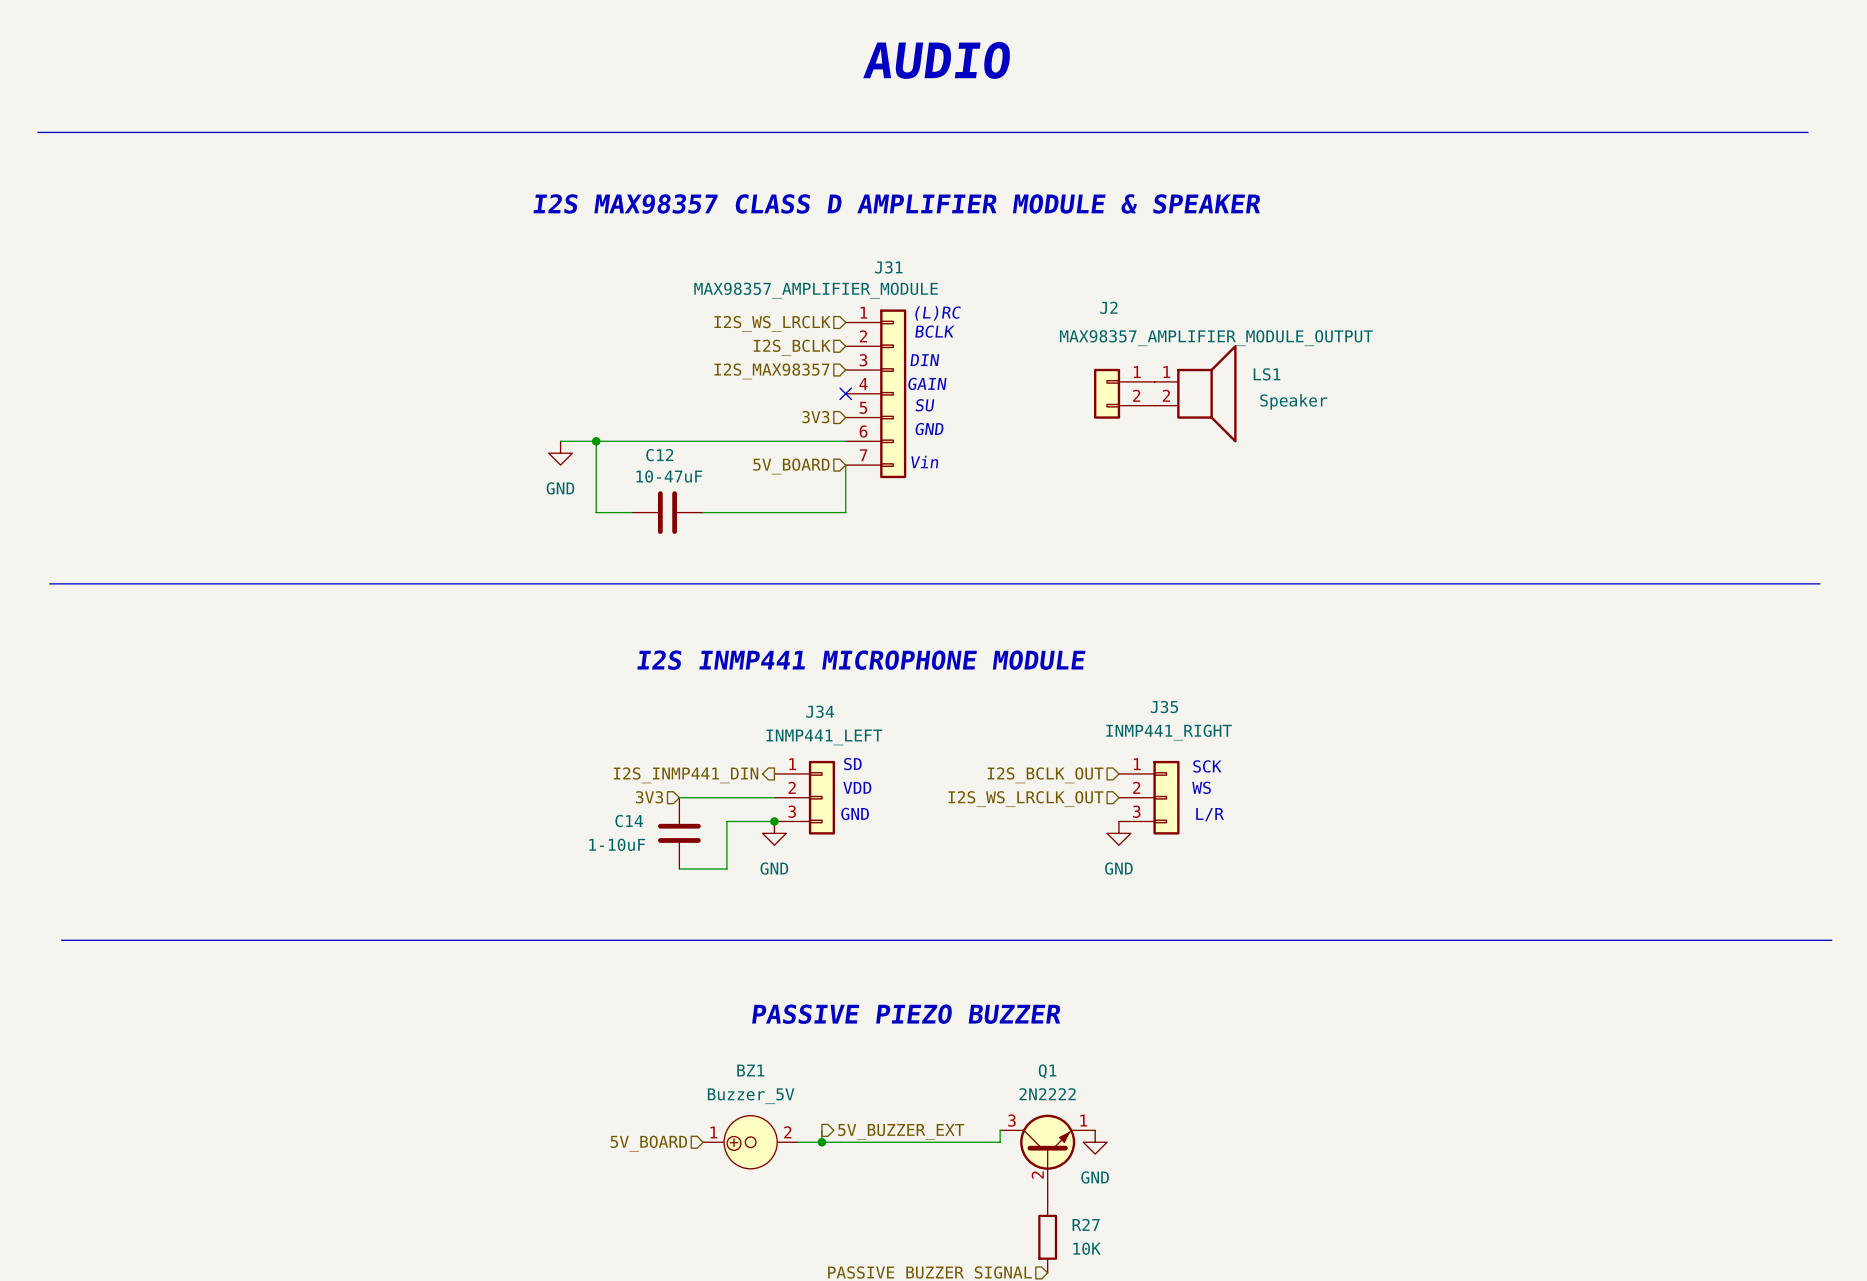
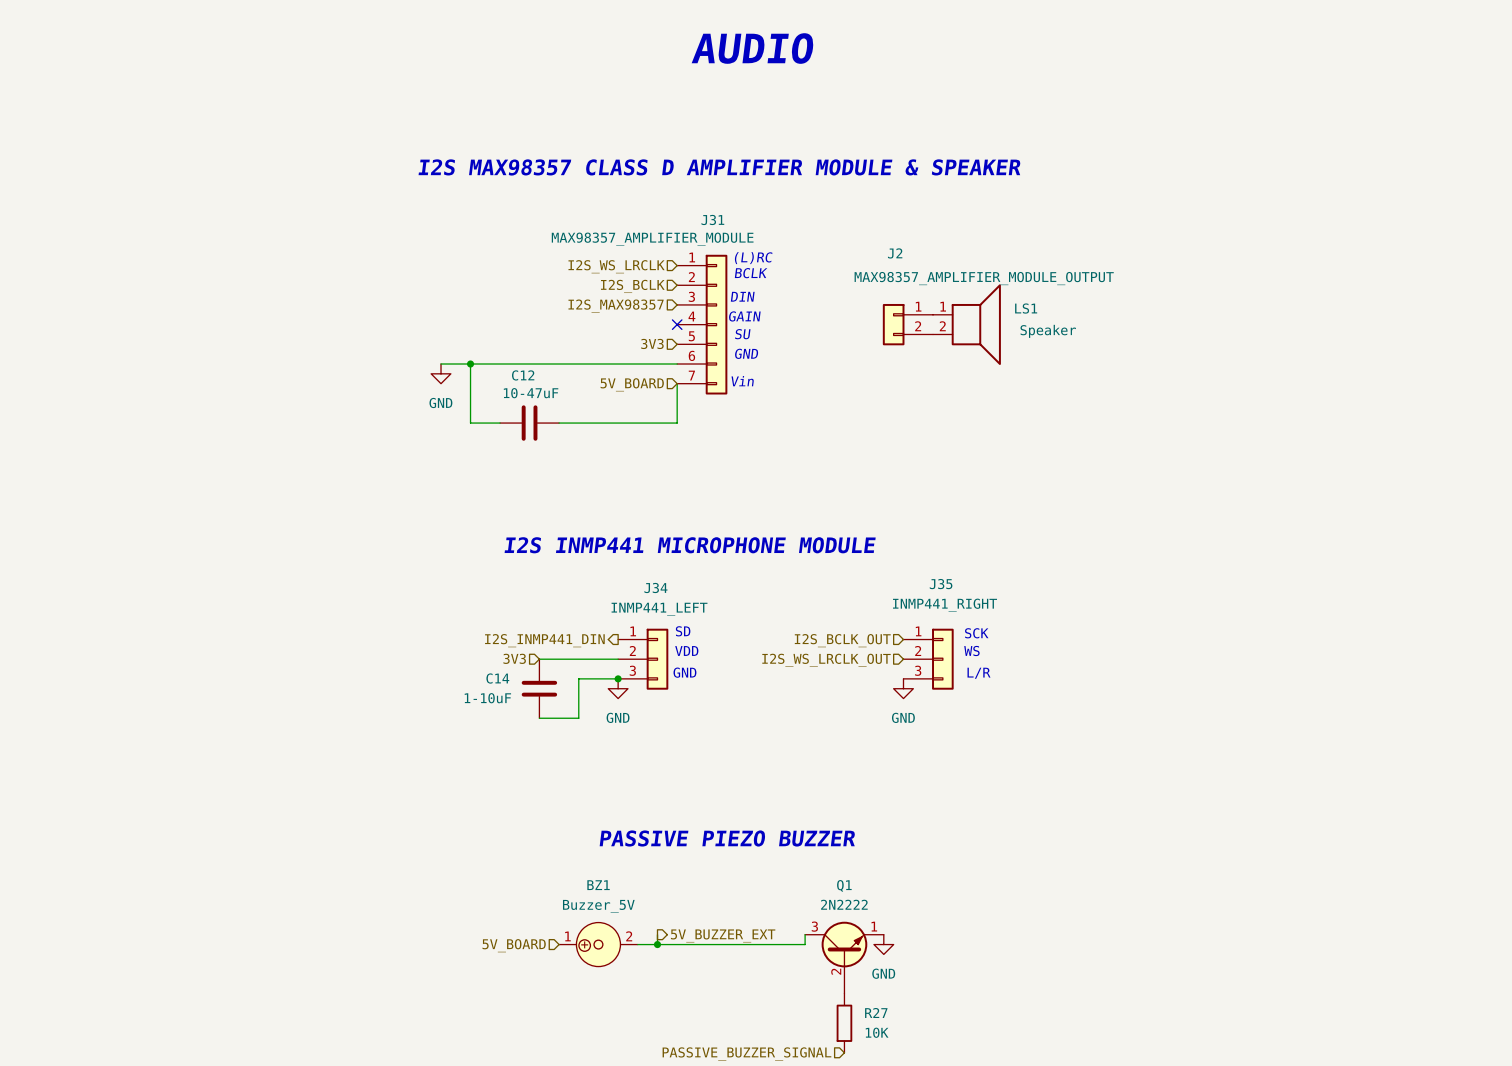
line: (37, 132) (1808, 132) -> none
line: (49, 583) (1819, 583) -> none
line: (61, 940) (1831, 940) -> none

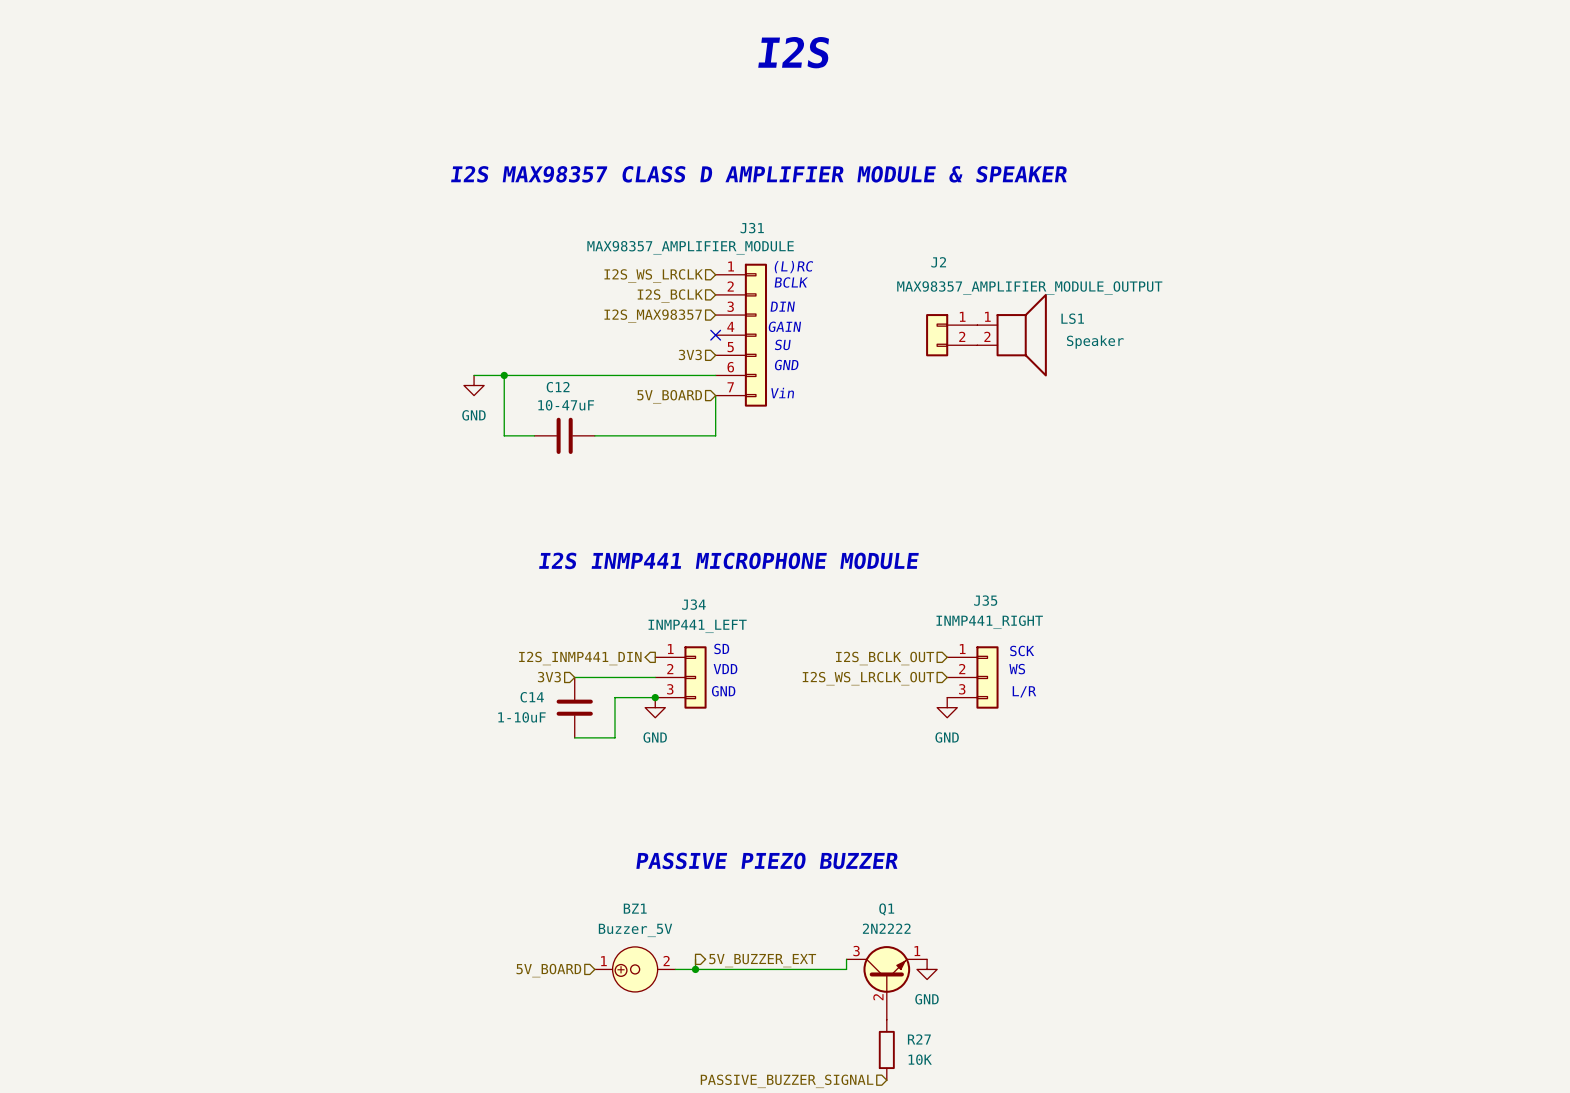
text: AUDIO (752, 48) -> I2S (793, 52)

